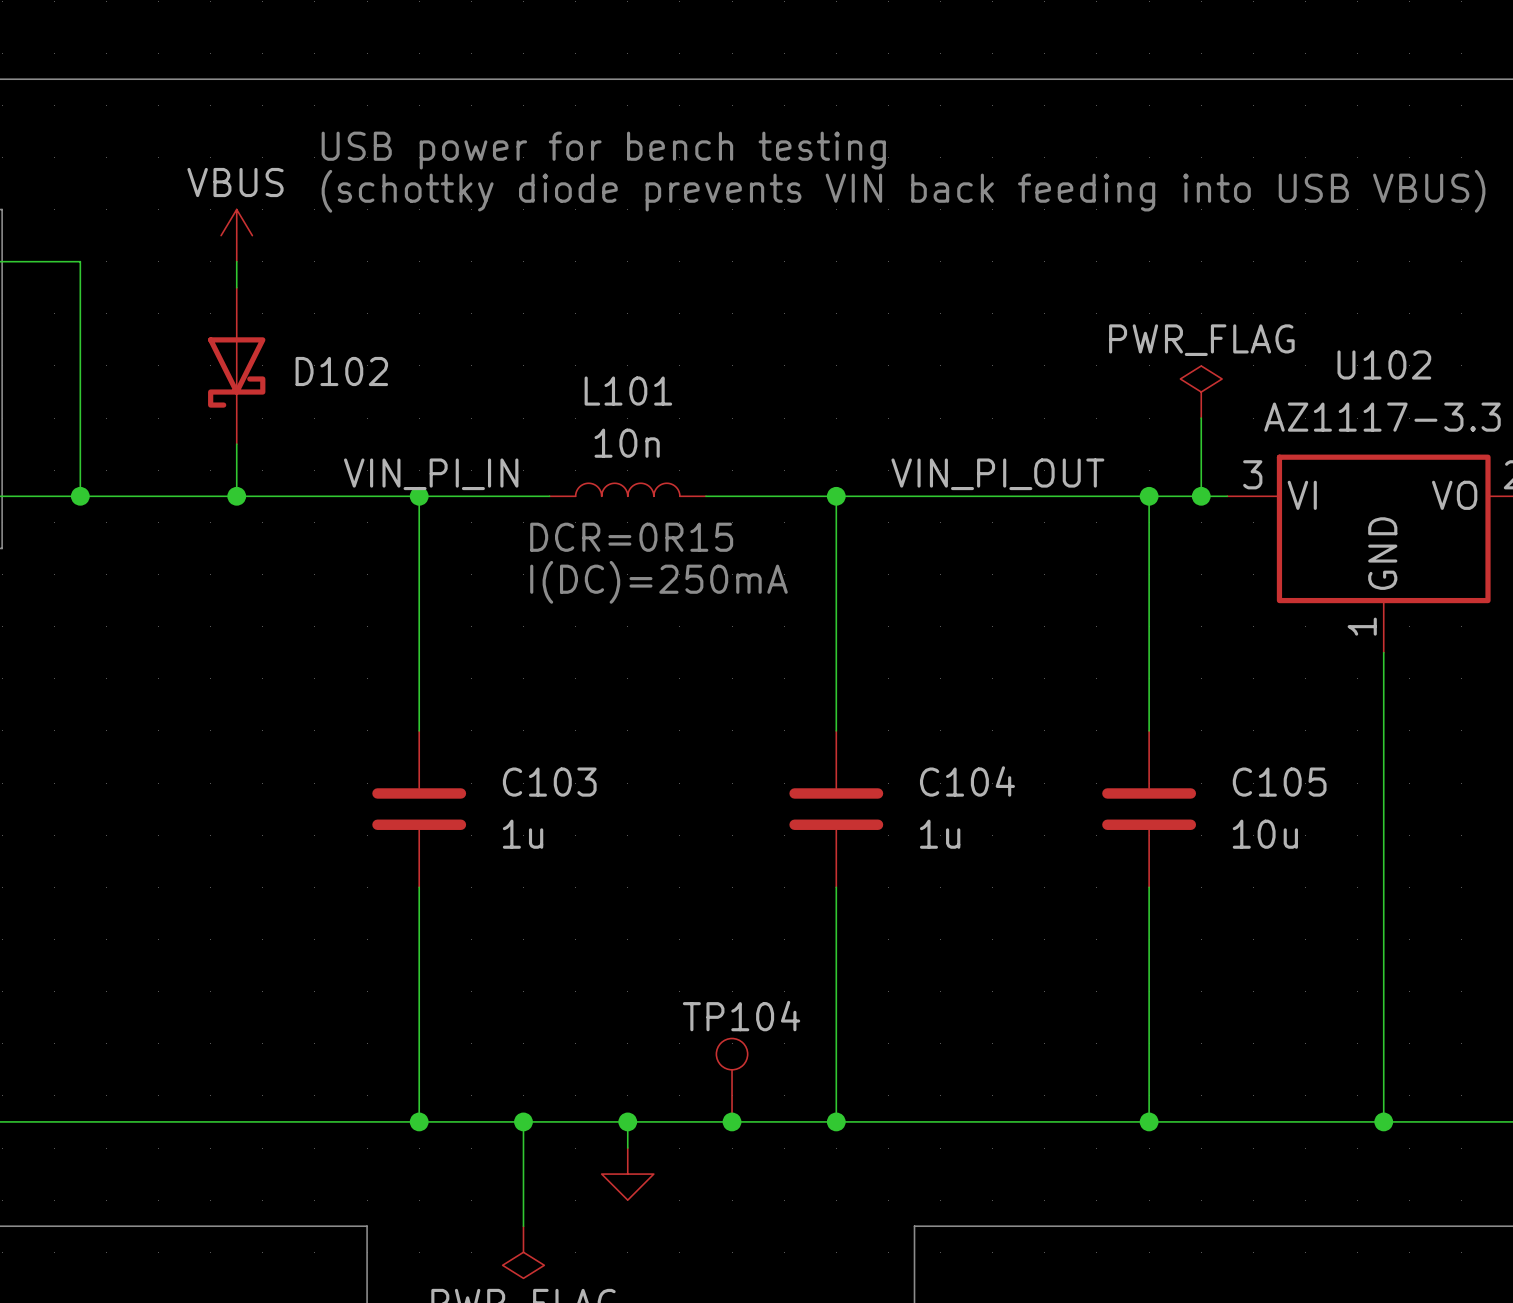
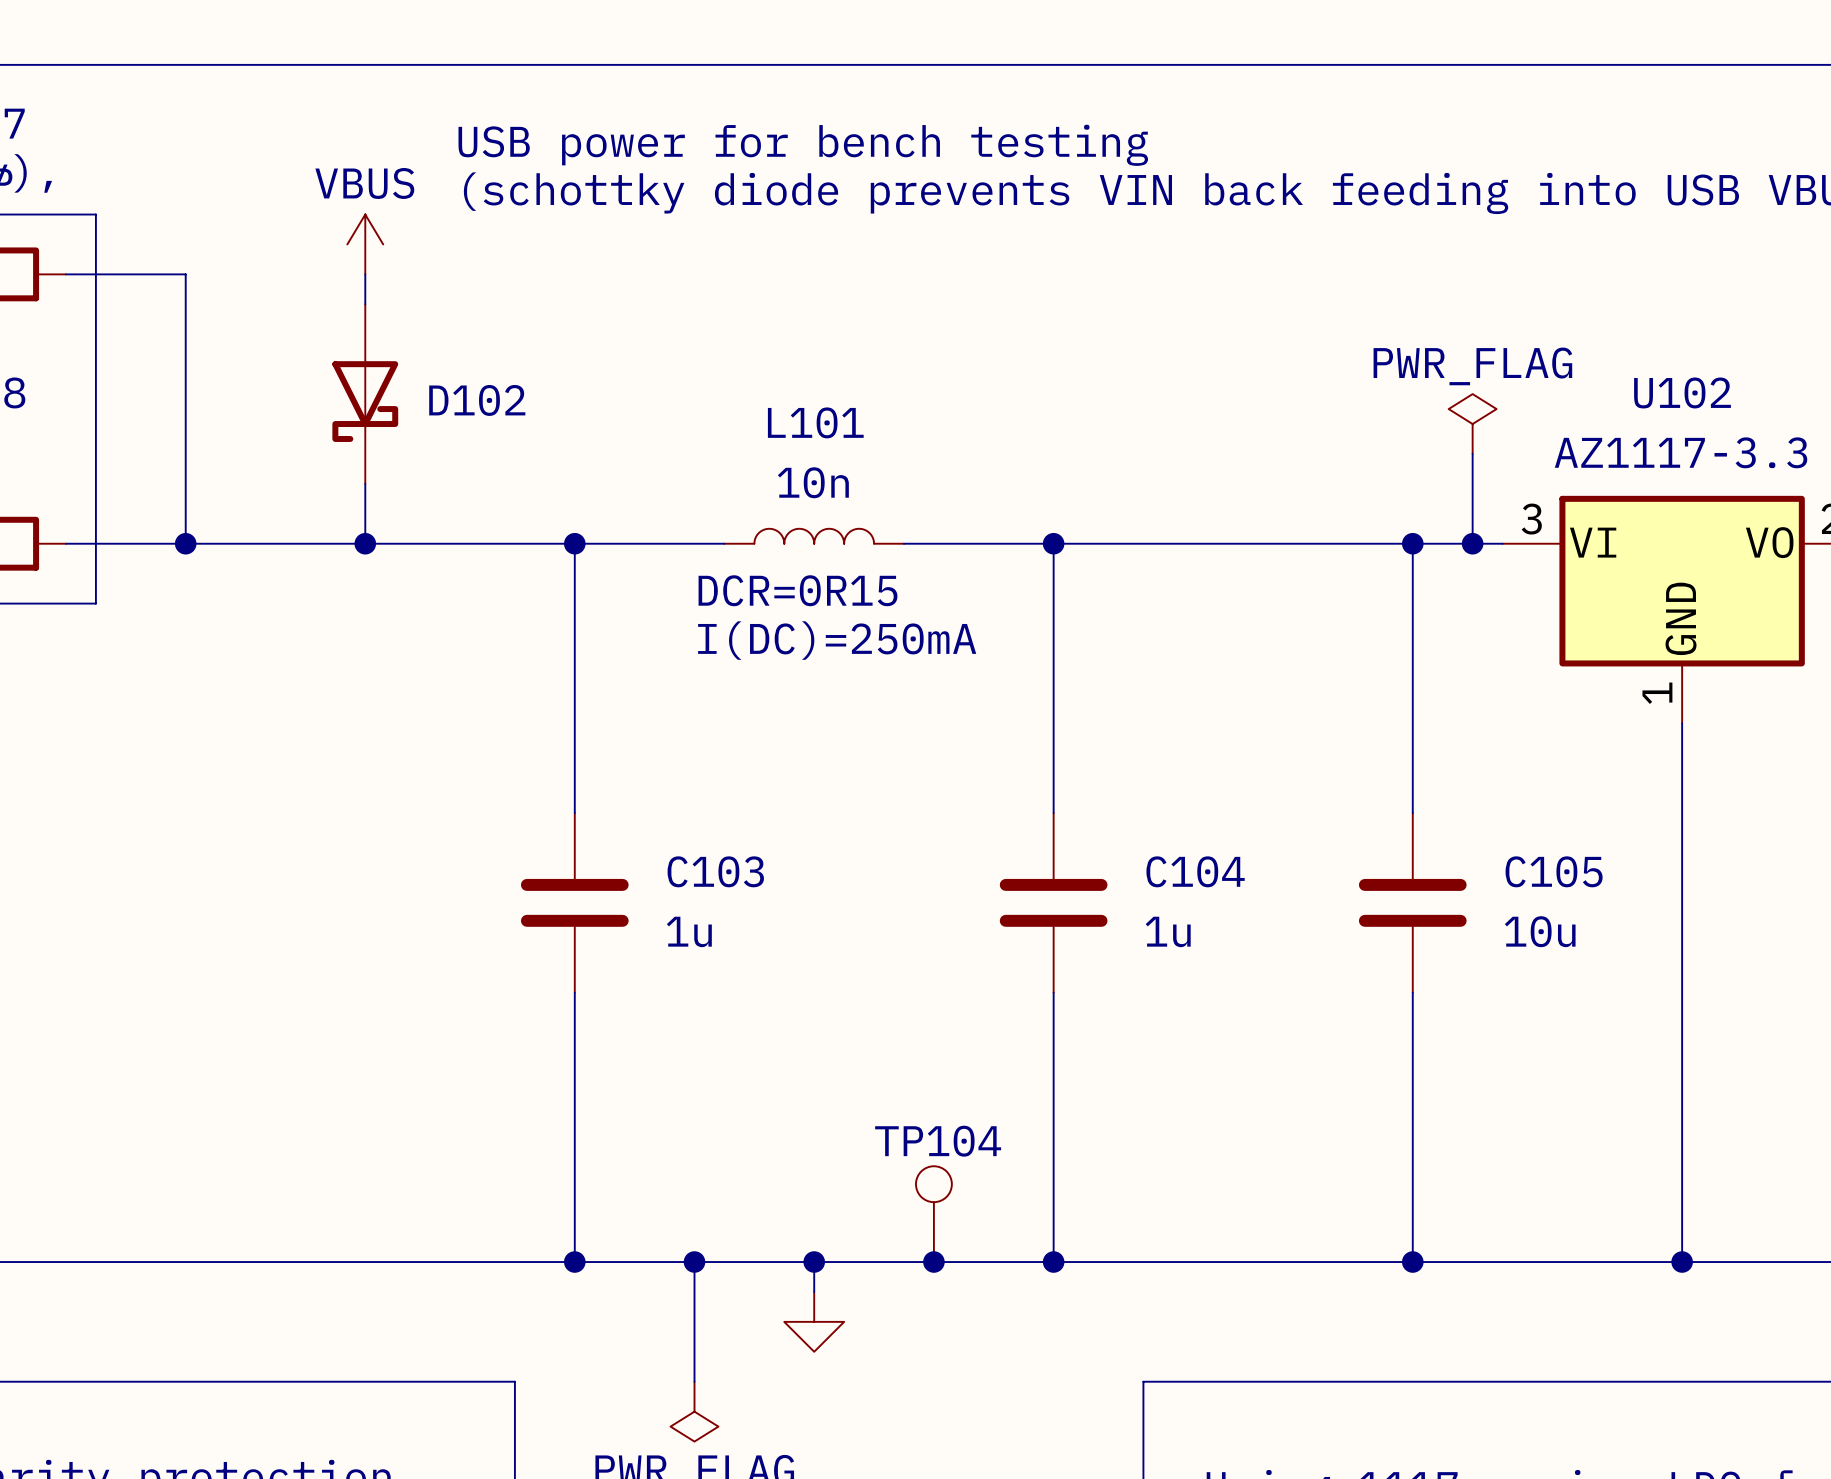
label: VIN_PI_IN (431, 474) -> none
label: VIN_PI_OUT (997, 474) -> none

